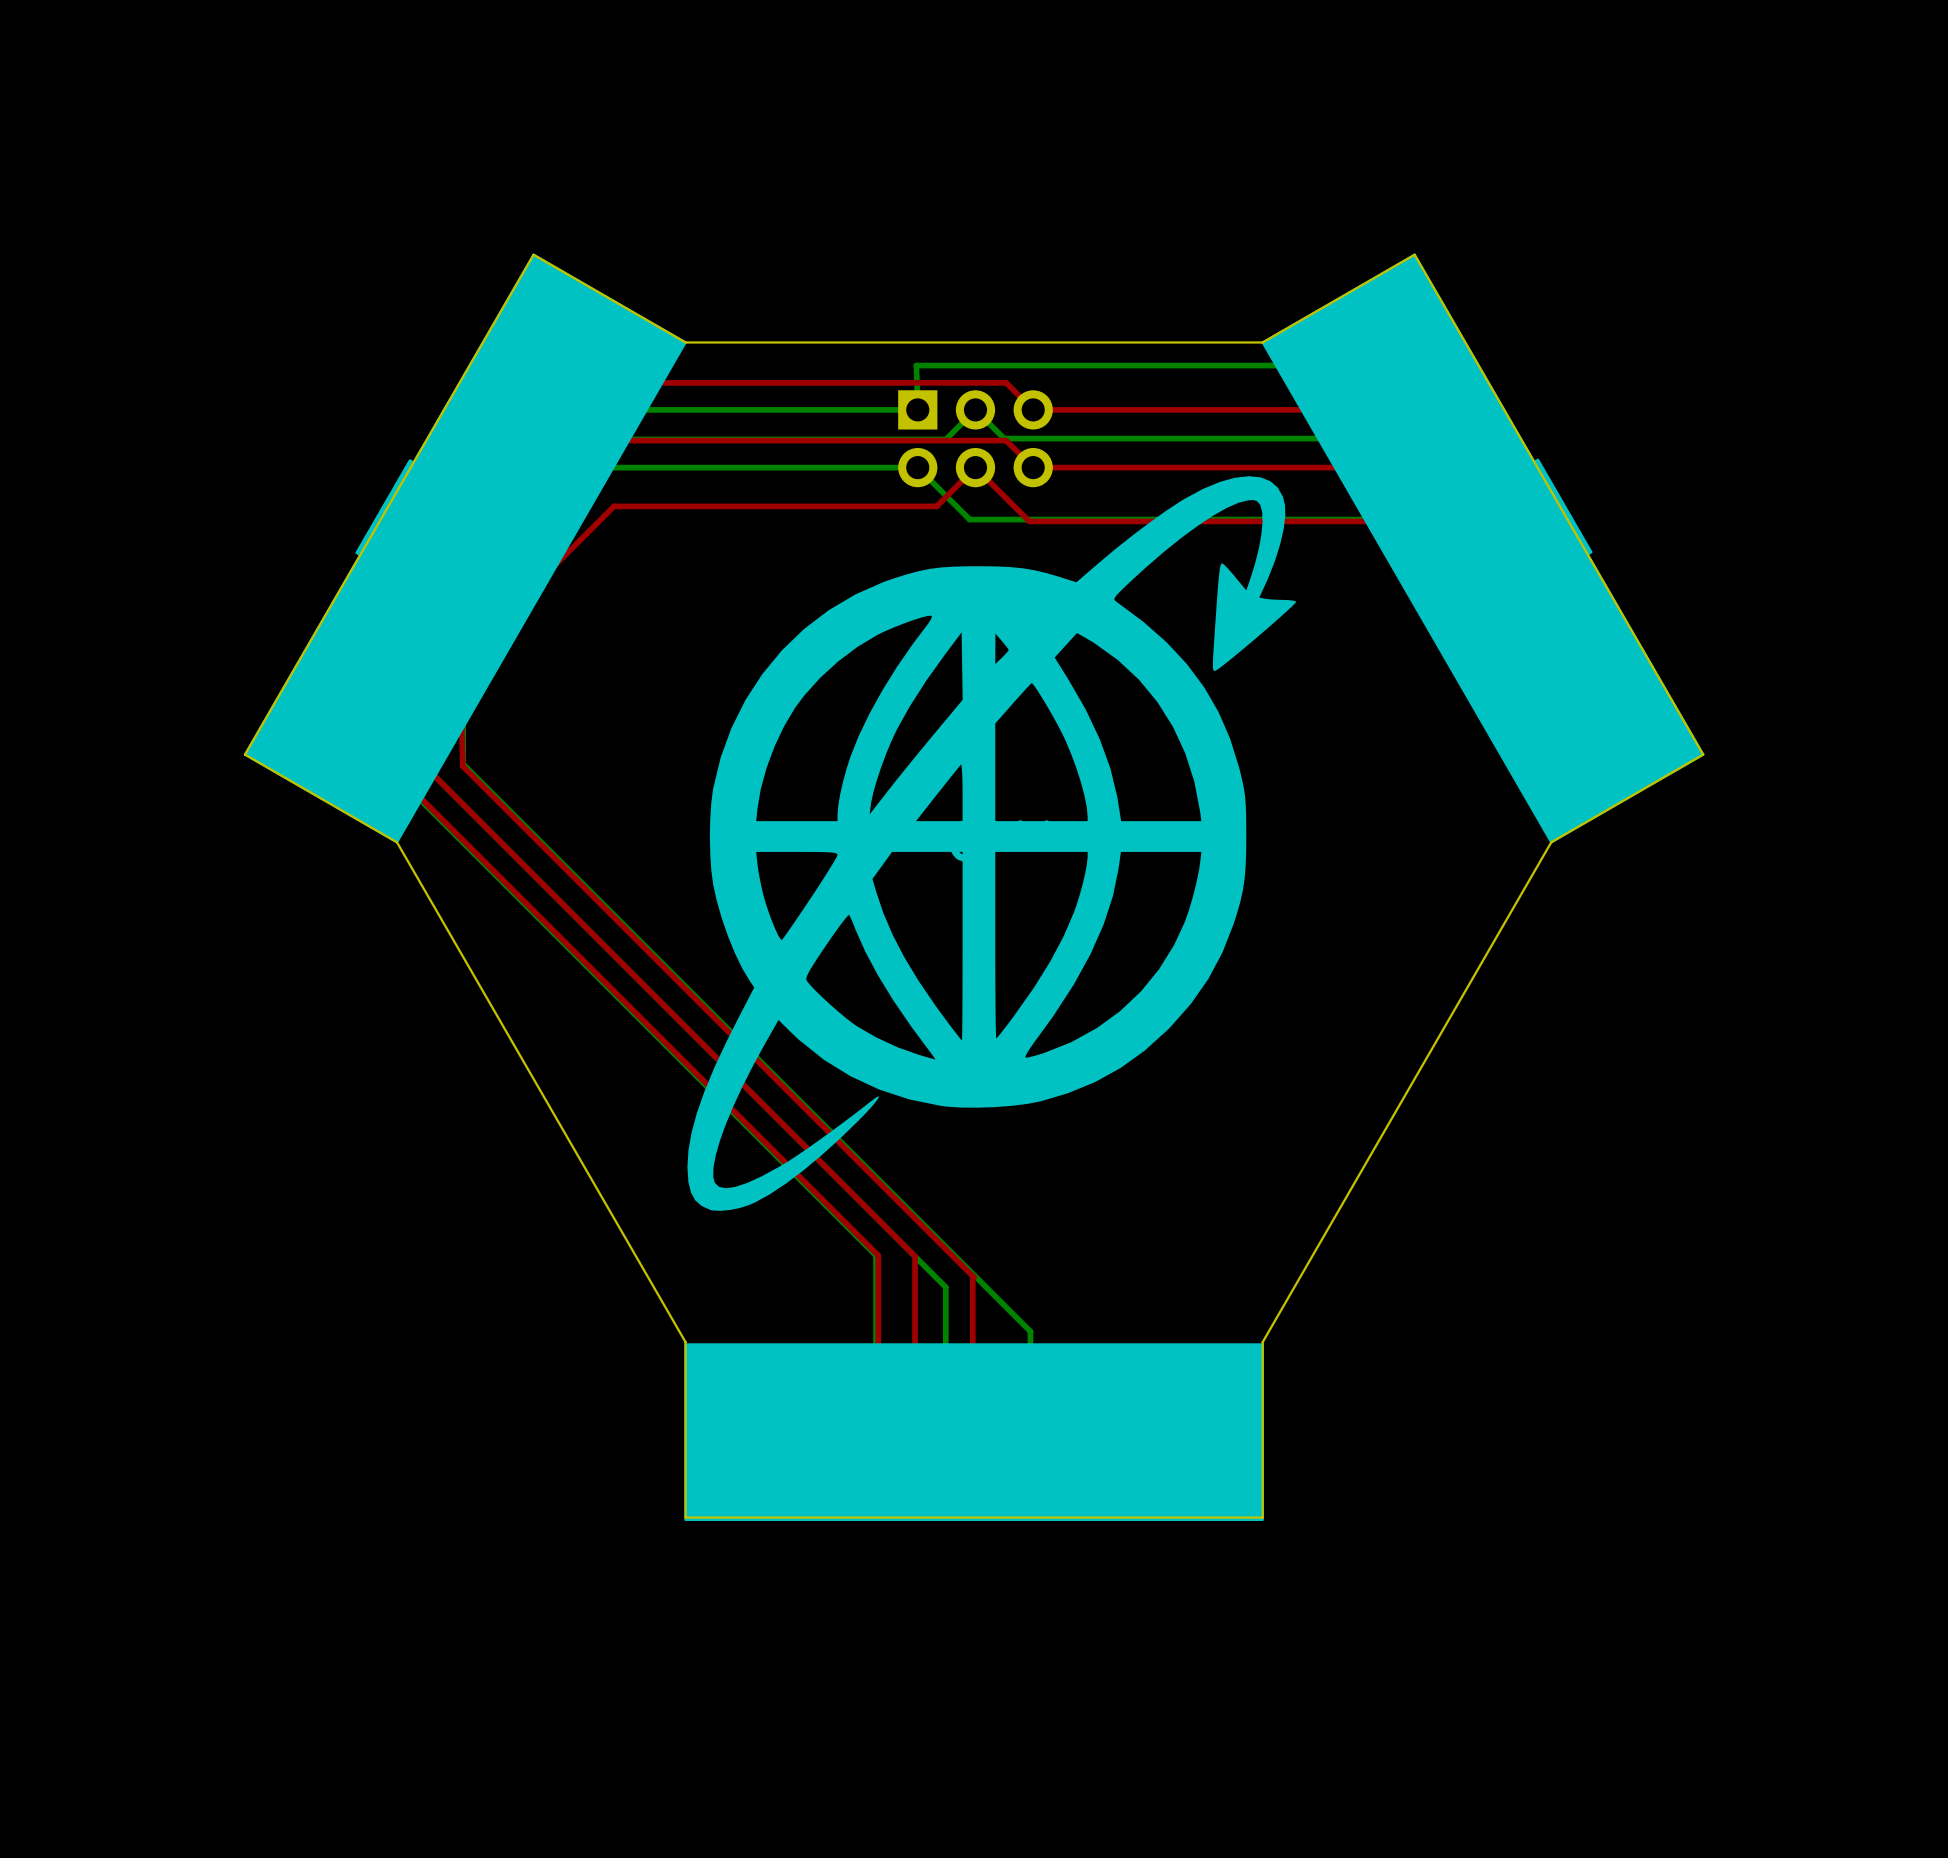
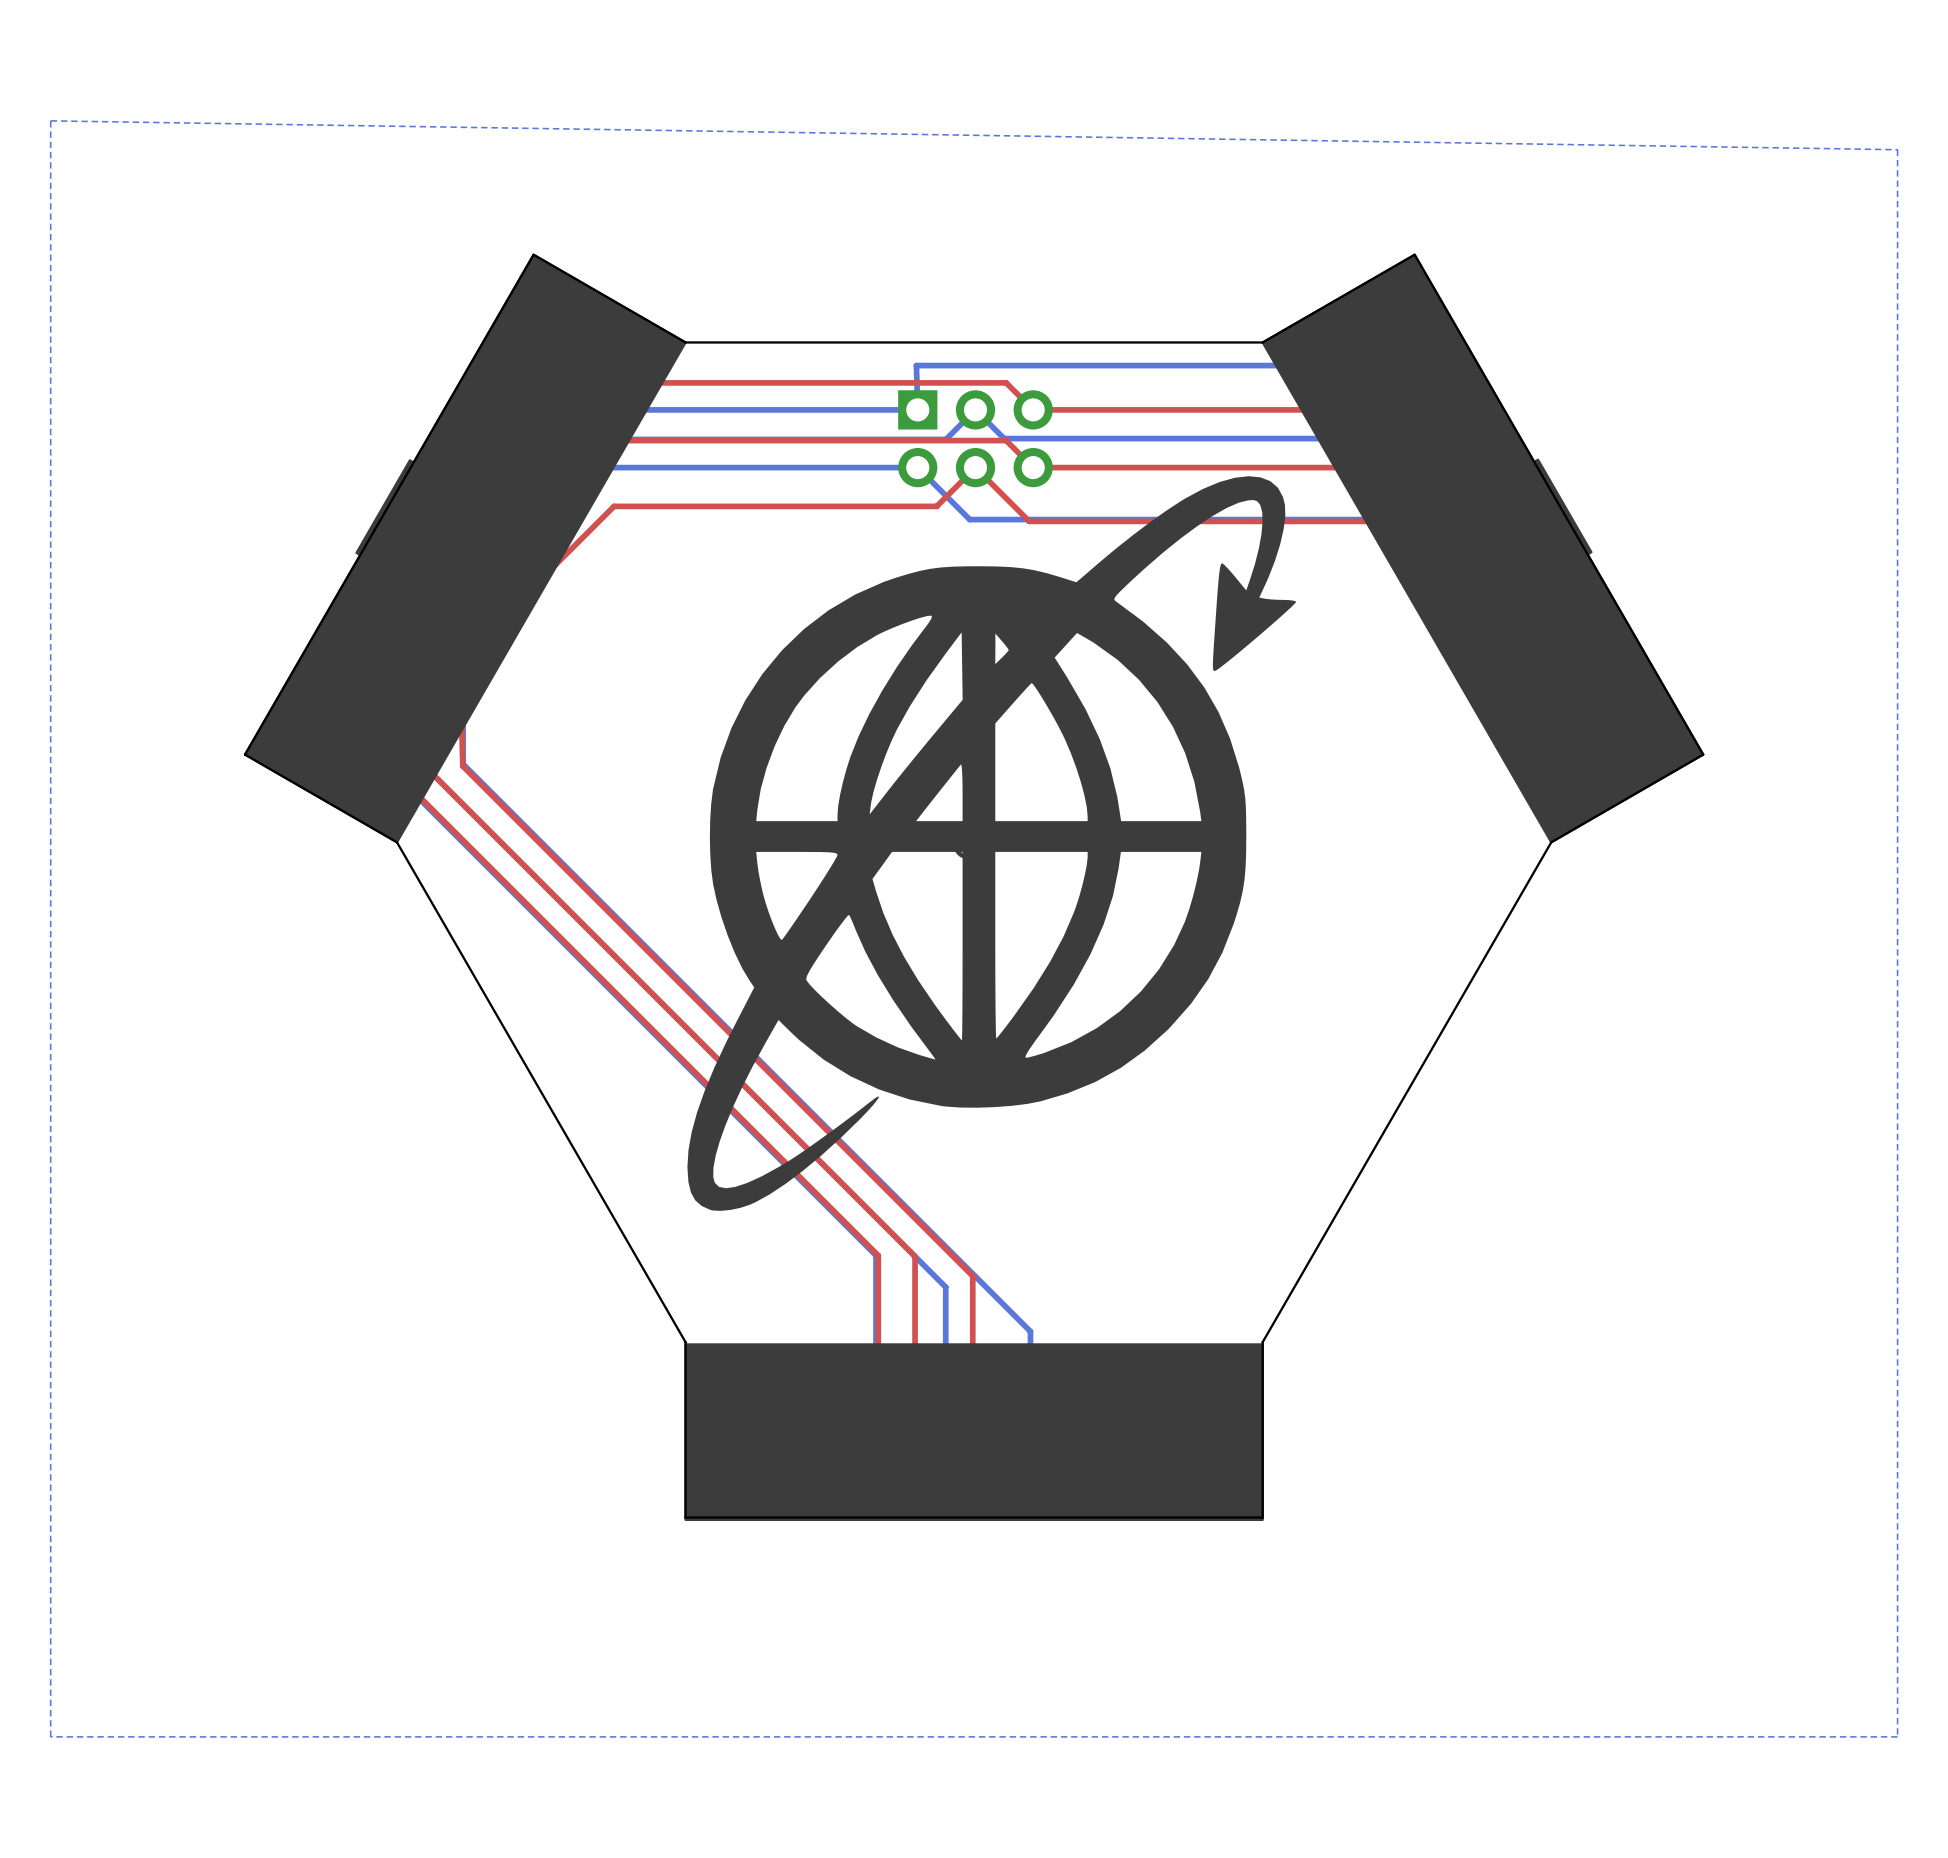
bottom zone outline: none -> (50, 120) (50, 1736) (1897, 1736) (1897, 149) (50, 120)

